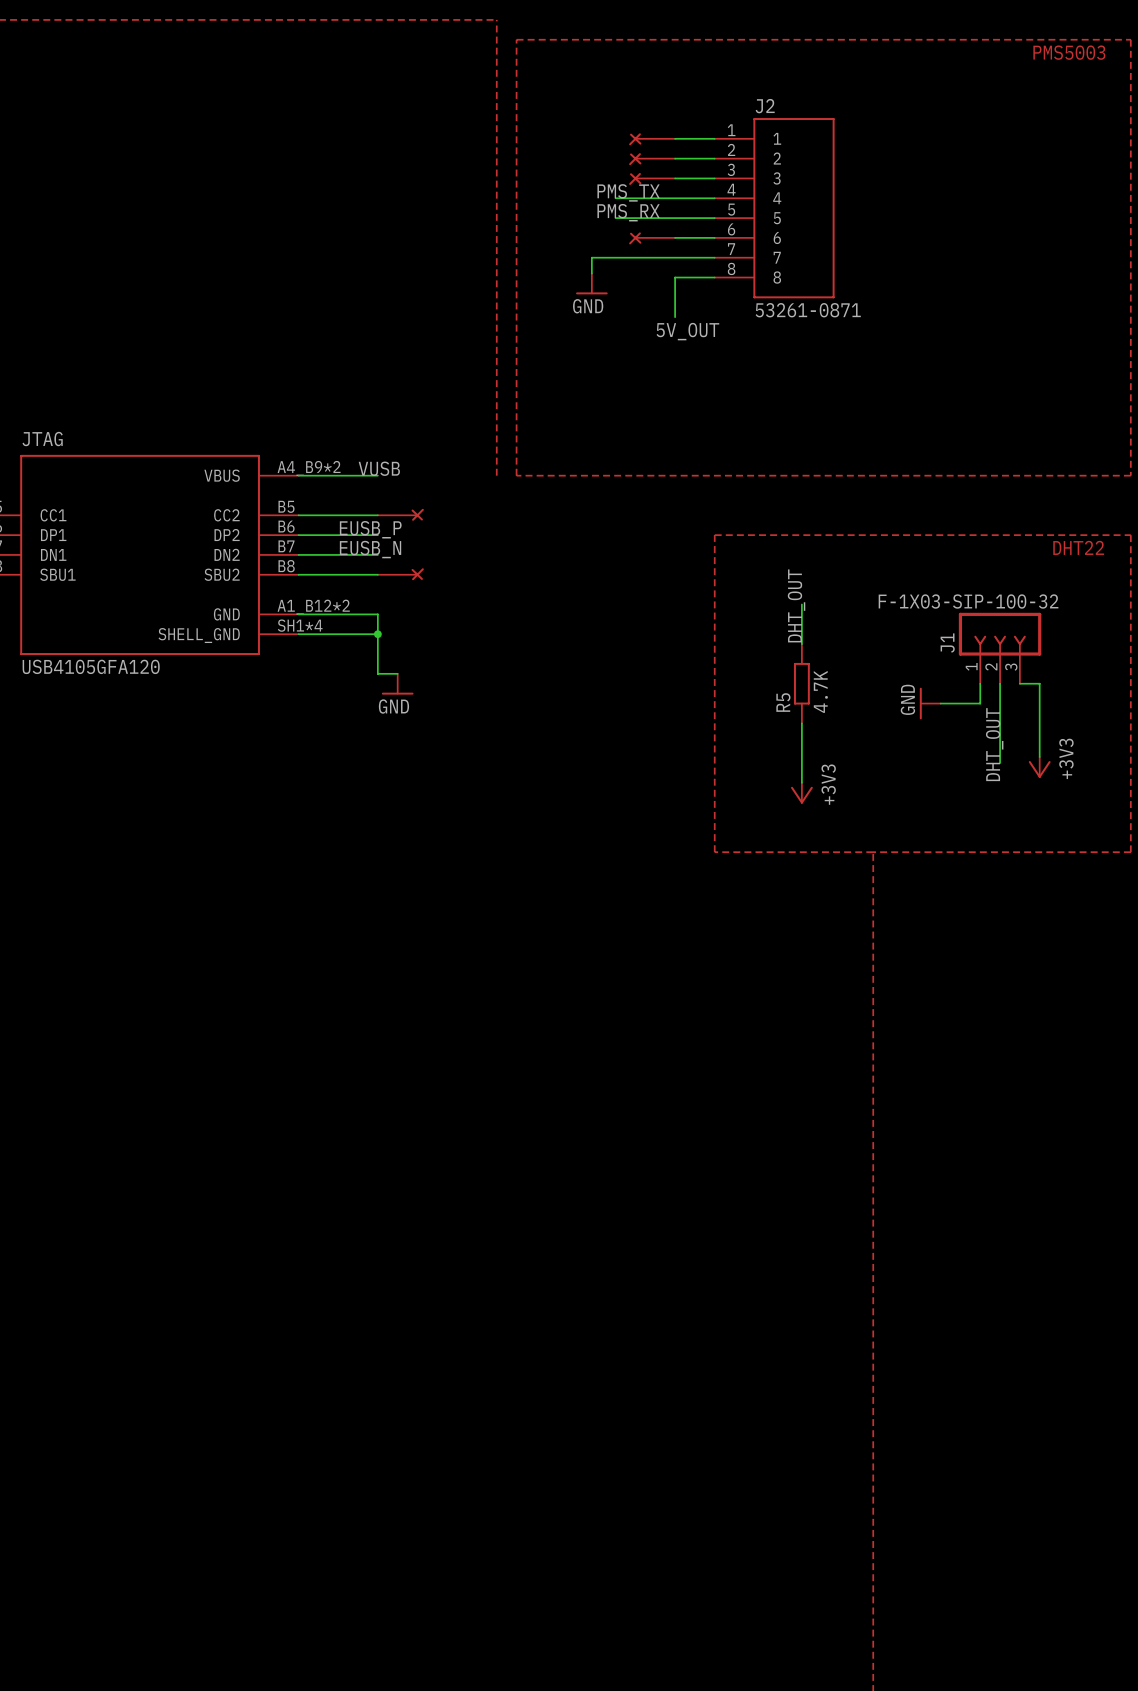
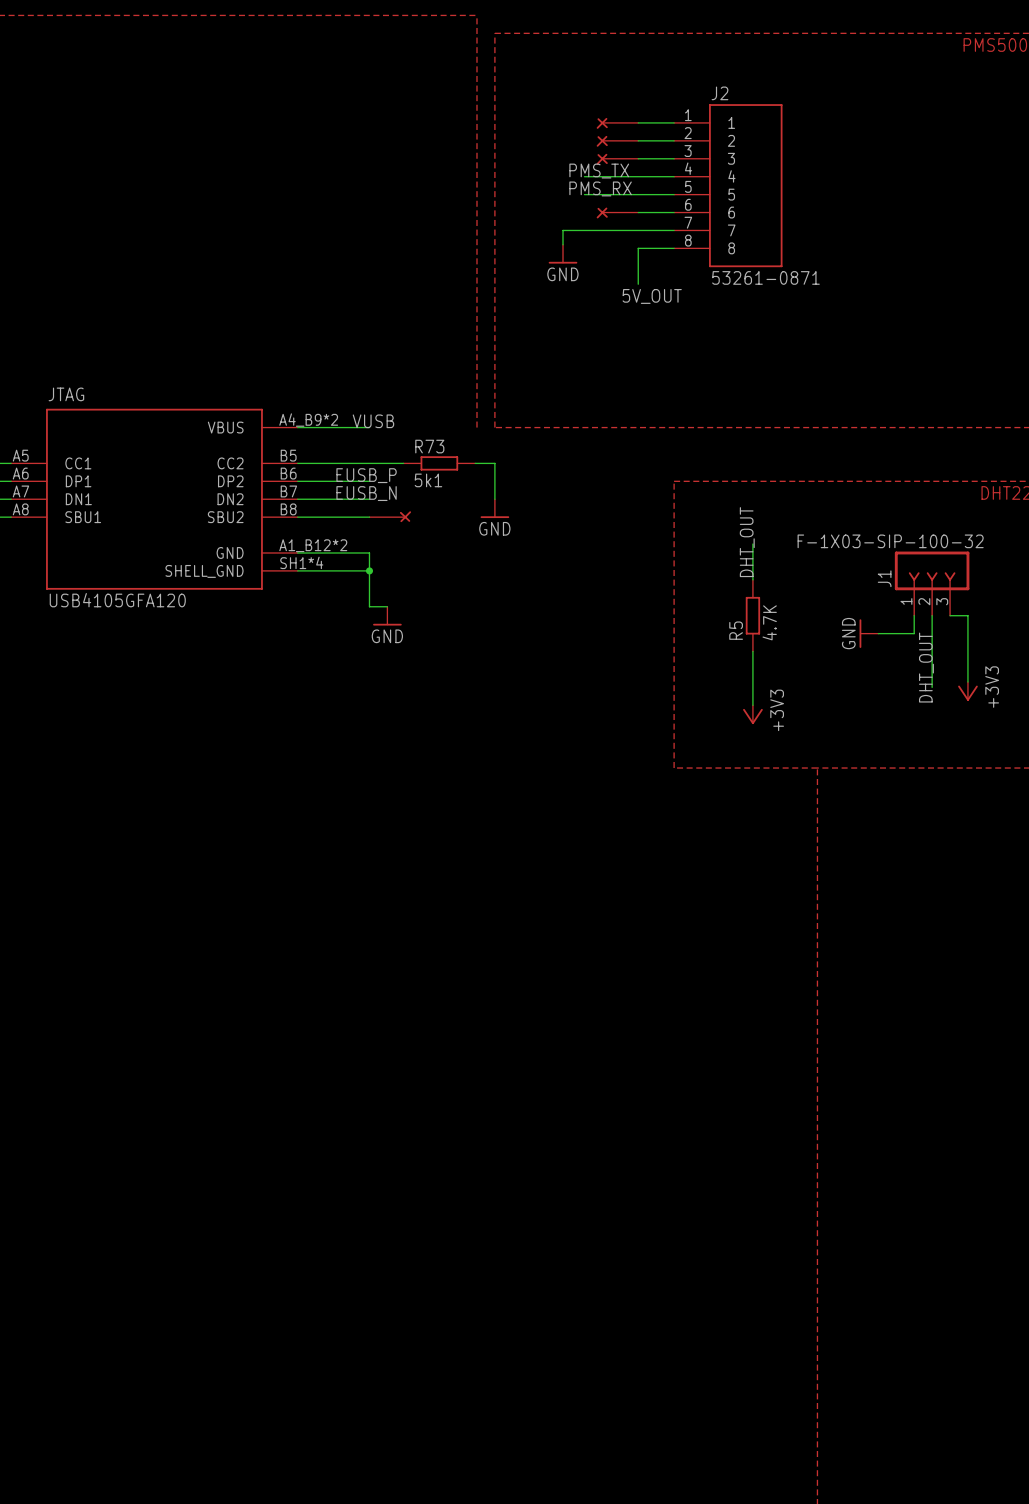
part: (400, 514) -> none
R73: none -> 5k1 (439, 463)
wire: none -> (475, 463) (494, 463) (494, 499)
power symbol: none -> GND (494, 508)

